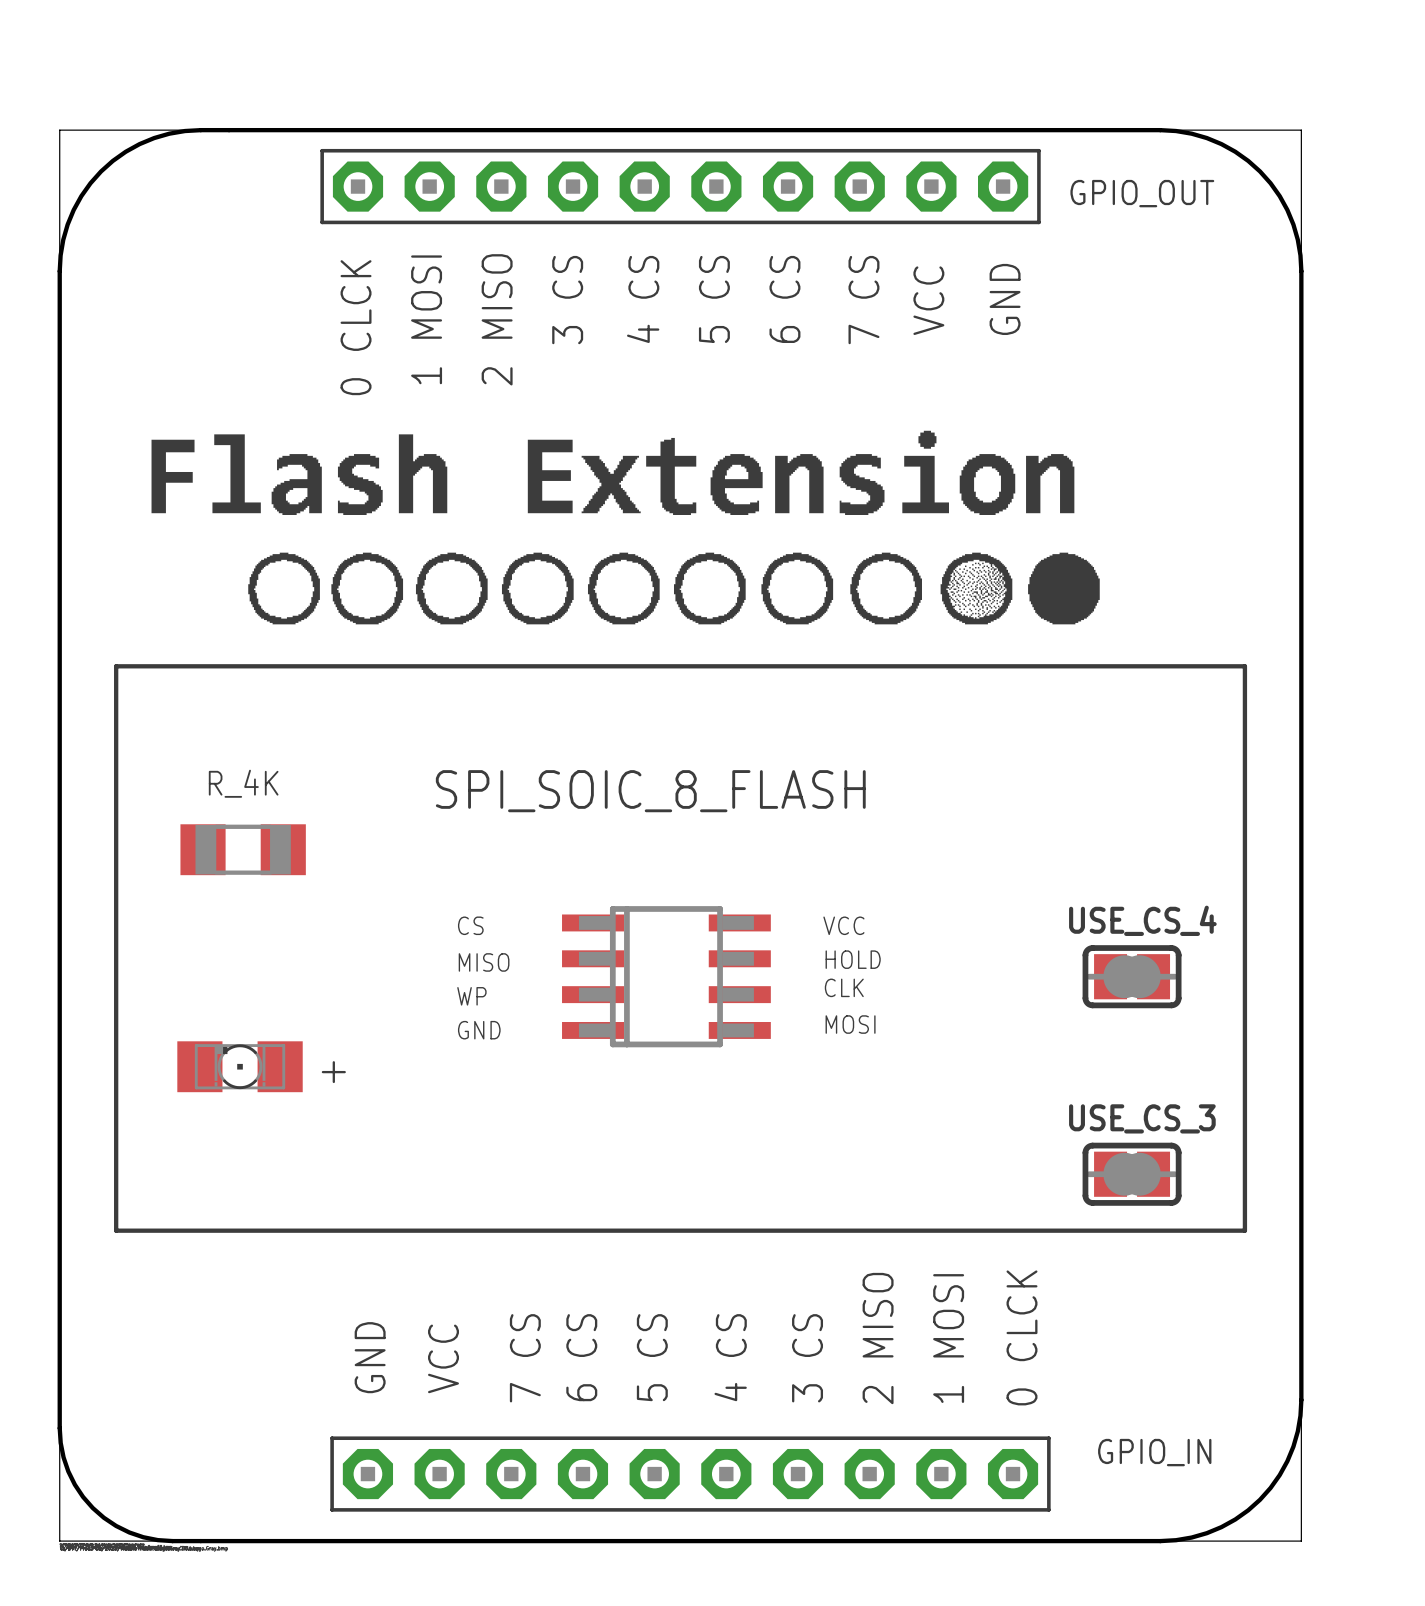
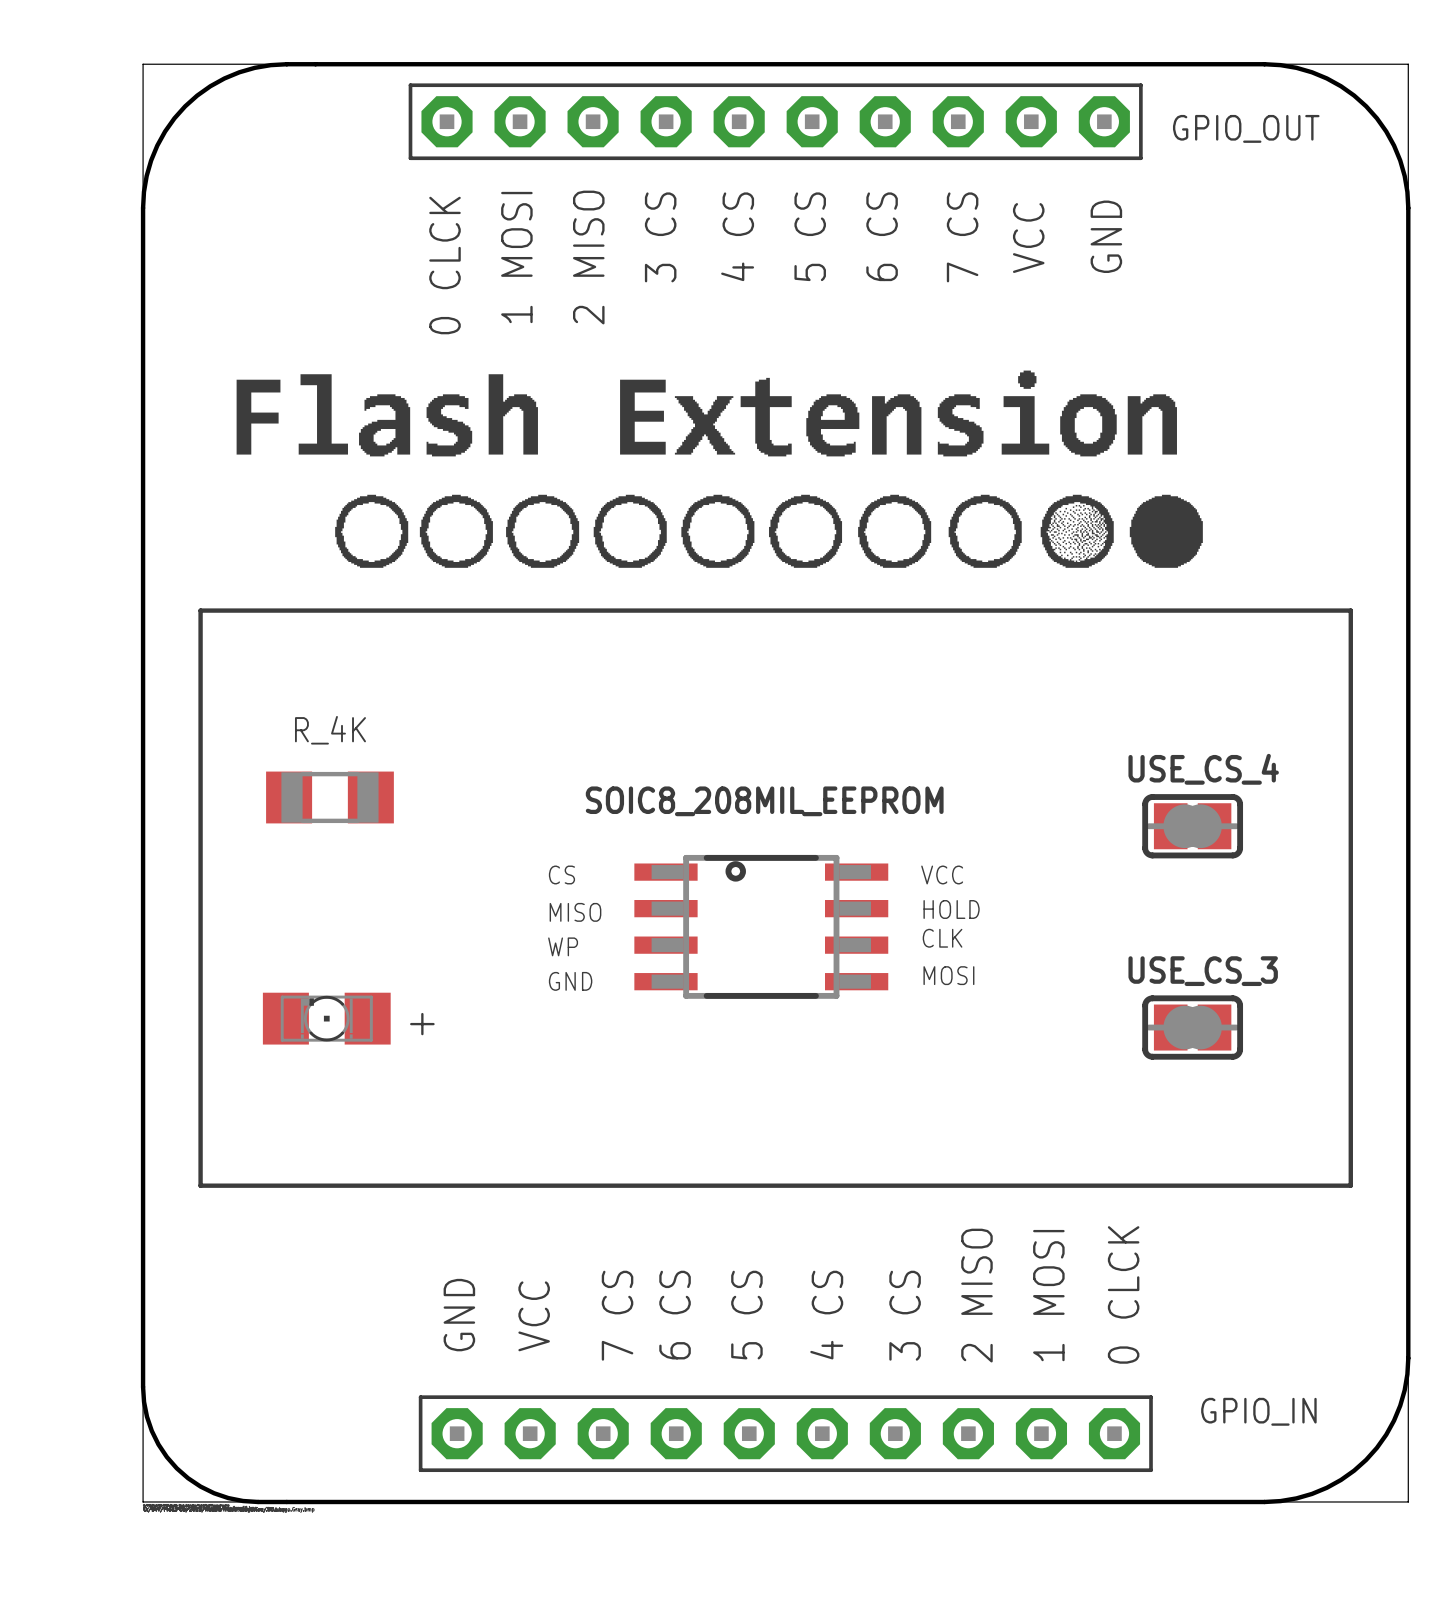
SPI_SOIC_8_FLASH: (666, 976) -> none
SOIC8_208MIL_EEPROM: none -> (761, 926)
USE_CS_4 position: (1132, 976) -> (1192, 826)
USE_CS_3 position: (1132, 1174) -> (1192, 1027)

